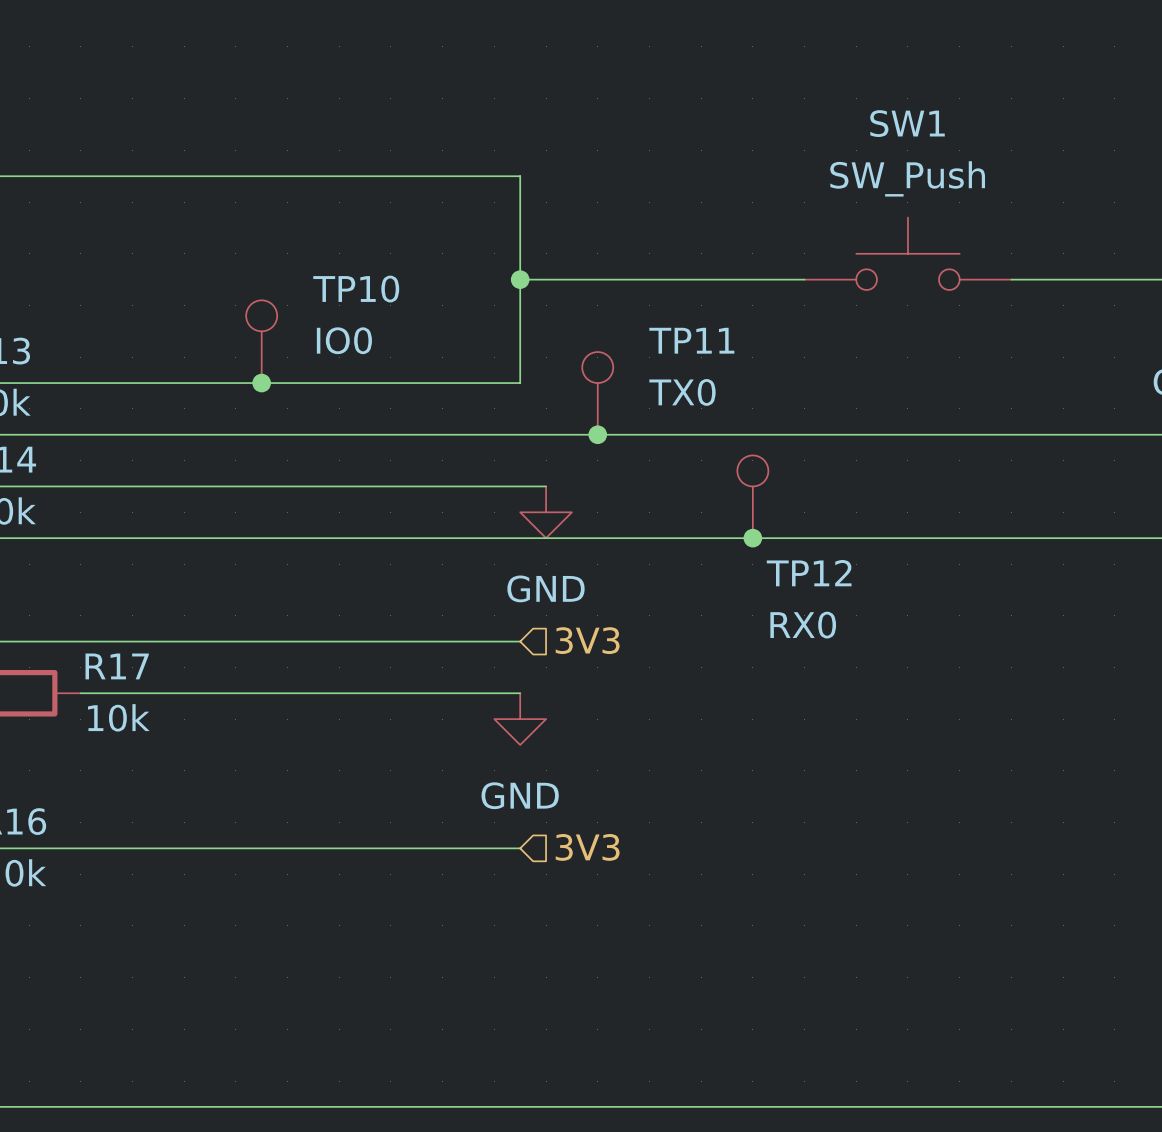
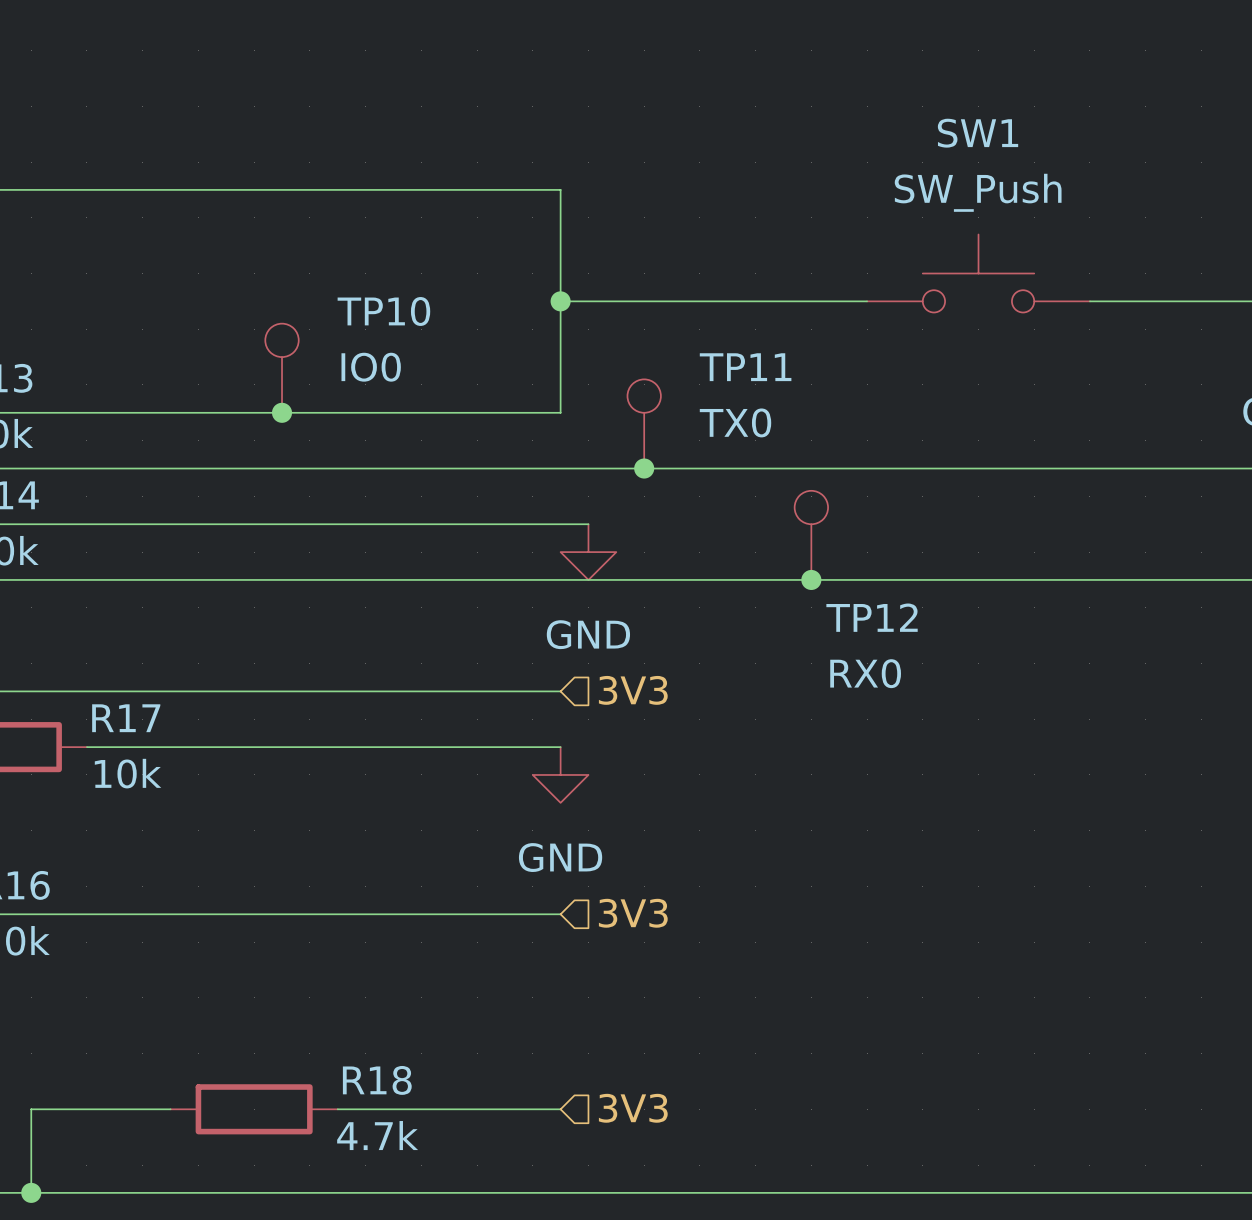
hierarchical label: none -> 3V3 (633, 1108)
wire: none -> (170, 1109) (31, 1109) (31, 1192)
R18: none -> 4.7k (254, 1109)
wire: none -> (337, 1109) (560, 1109)
junction: none -> (31, 1192)

